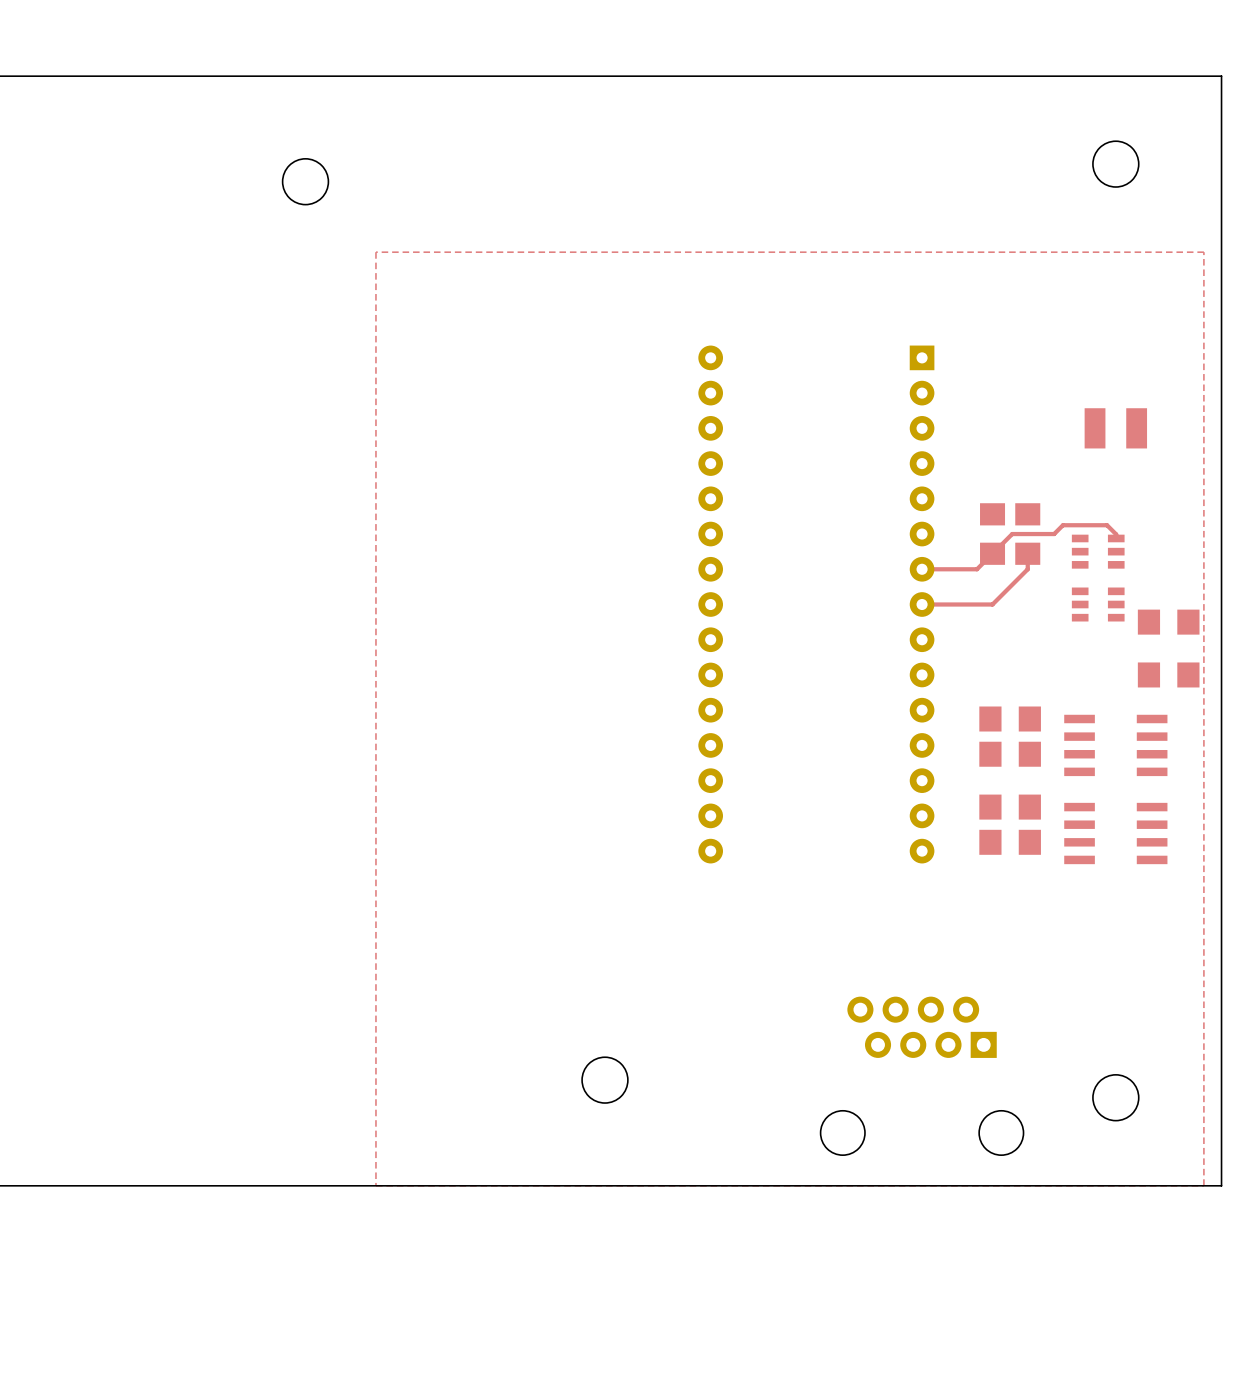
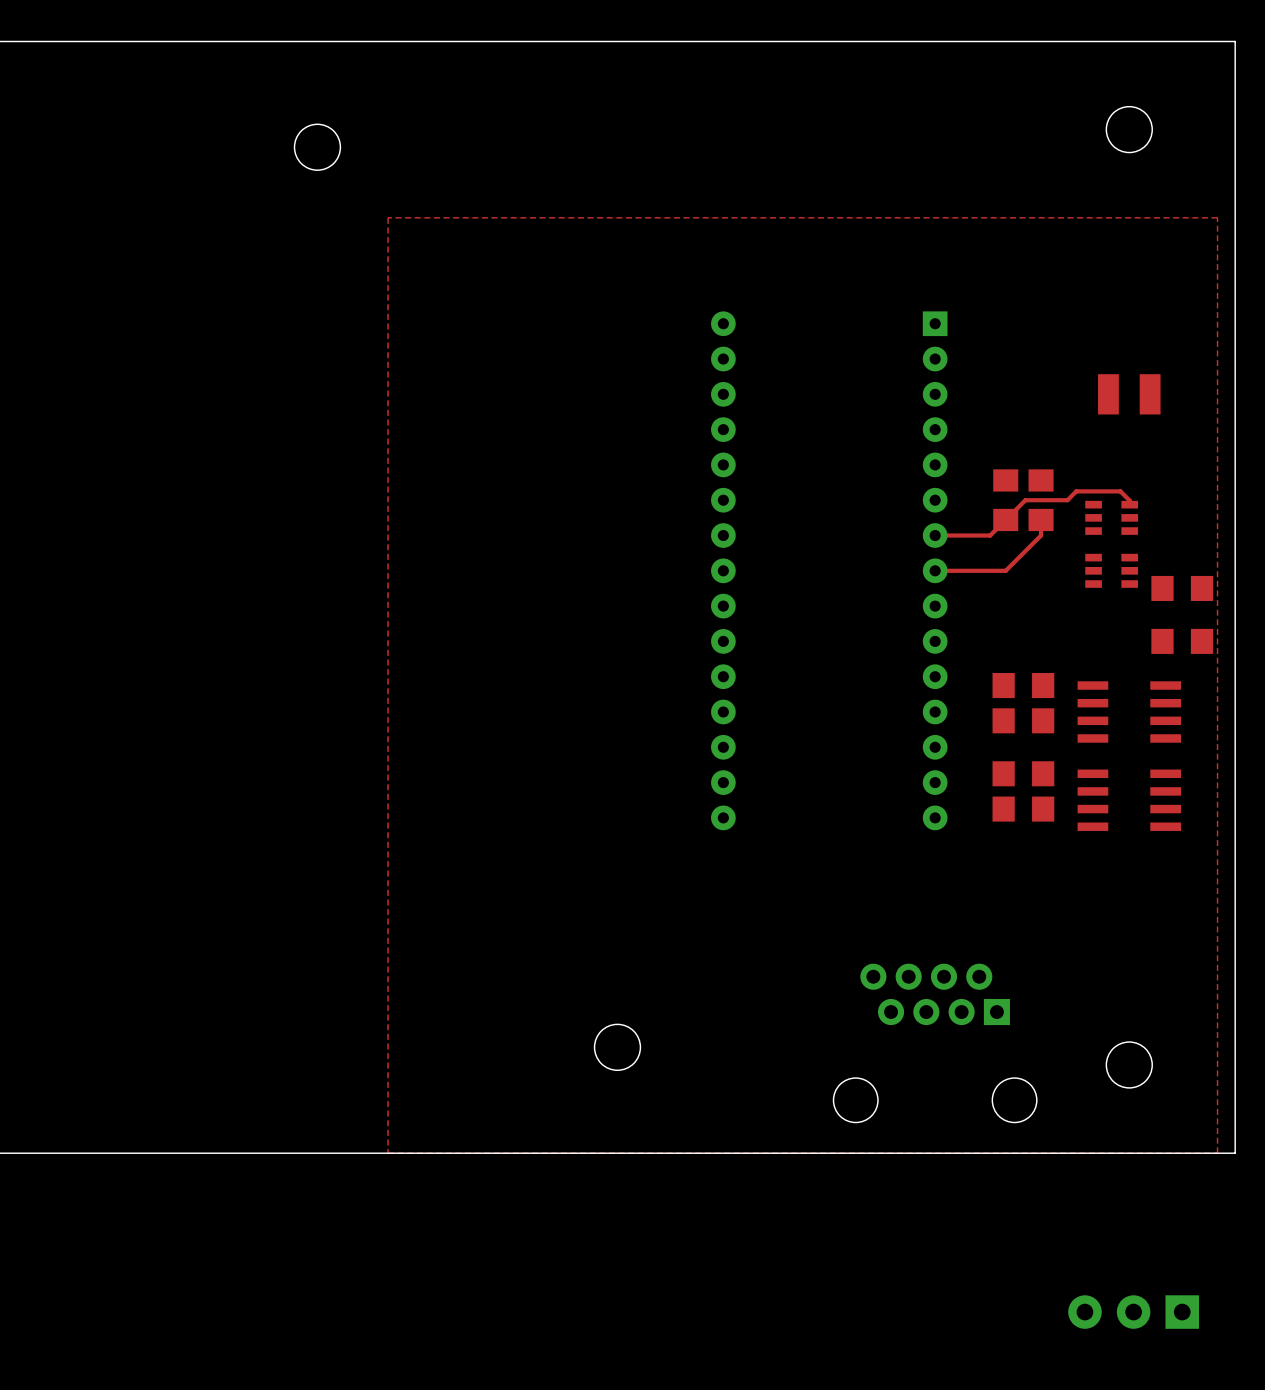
part: none -> (1133, 1312)

